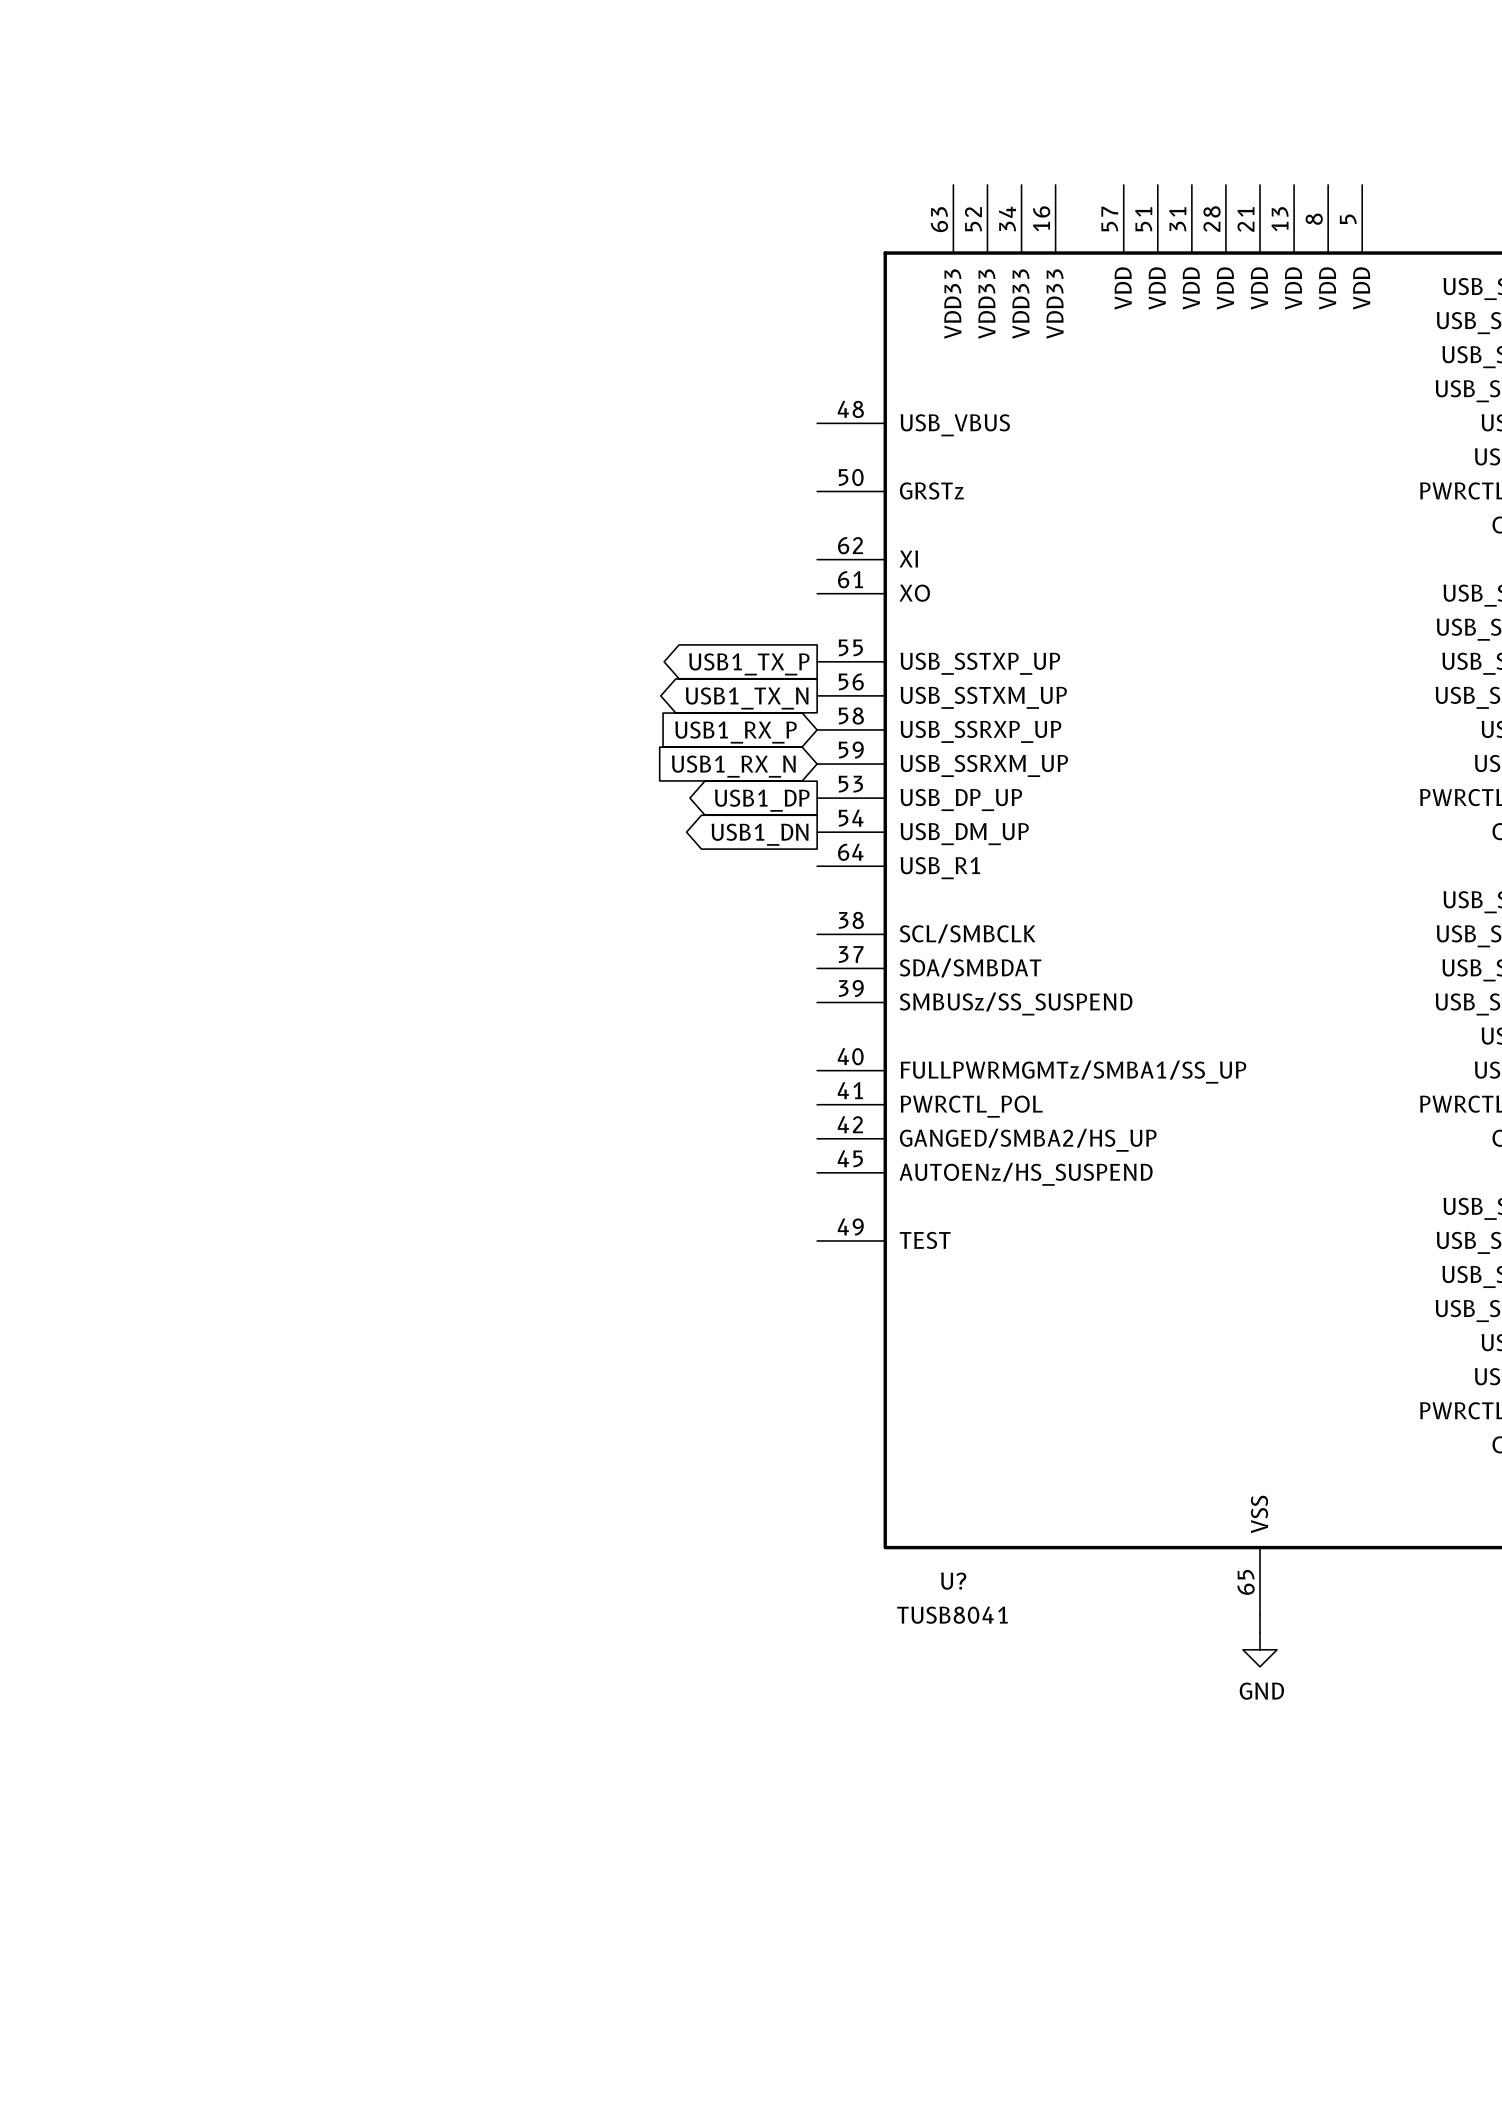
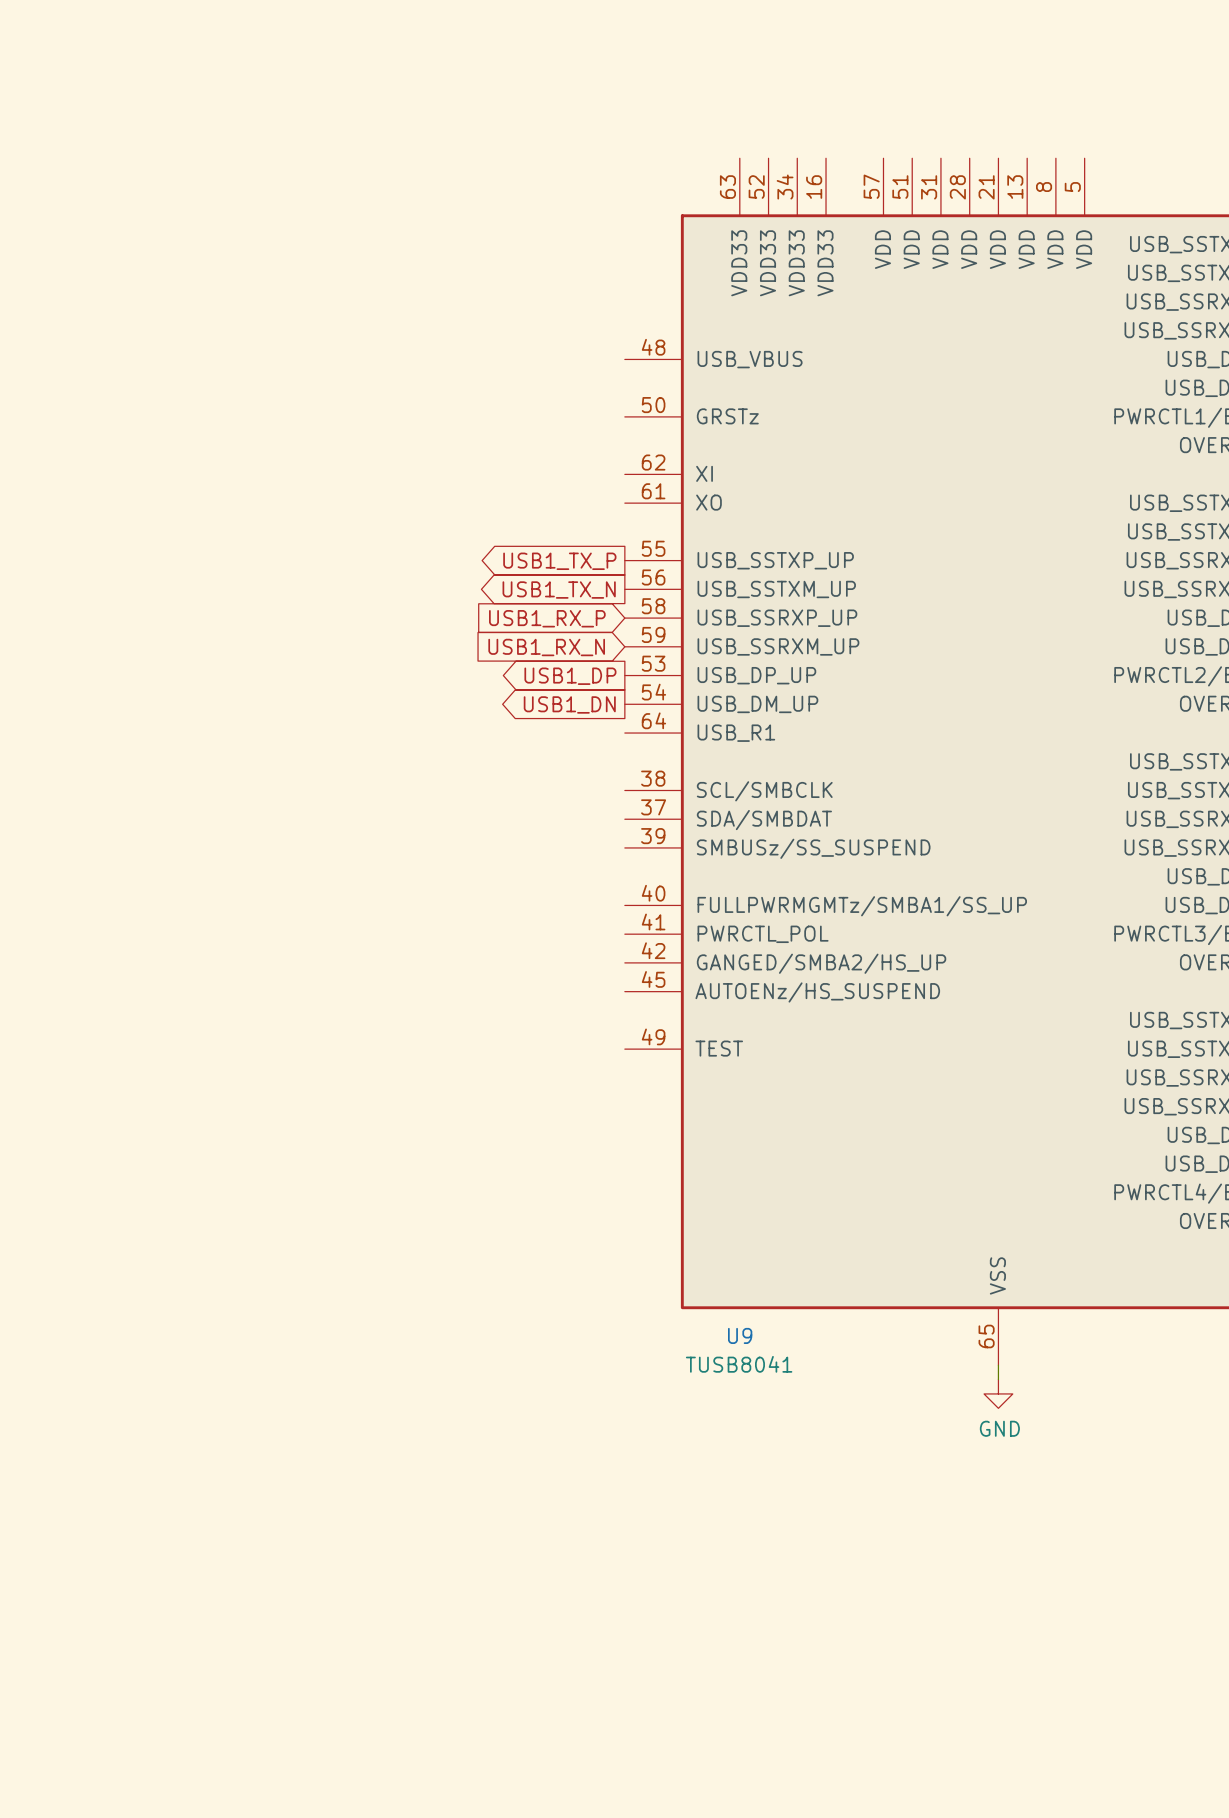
U? name: U? (953, 1581) -> U9 (740, 1335)

